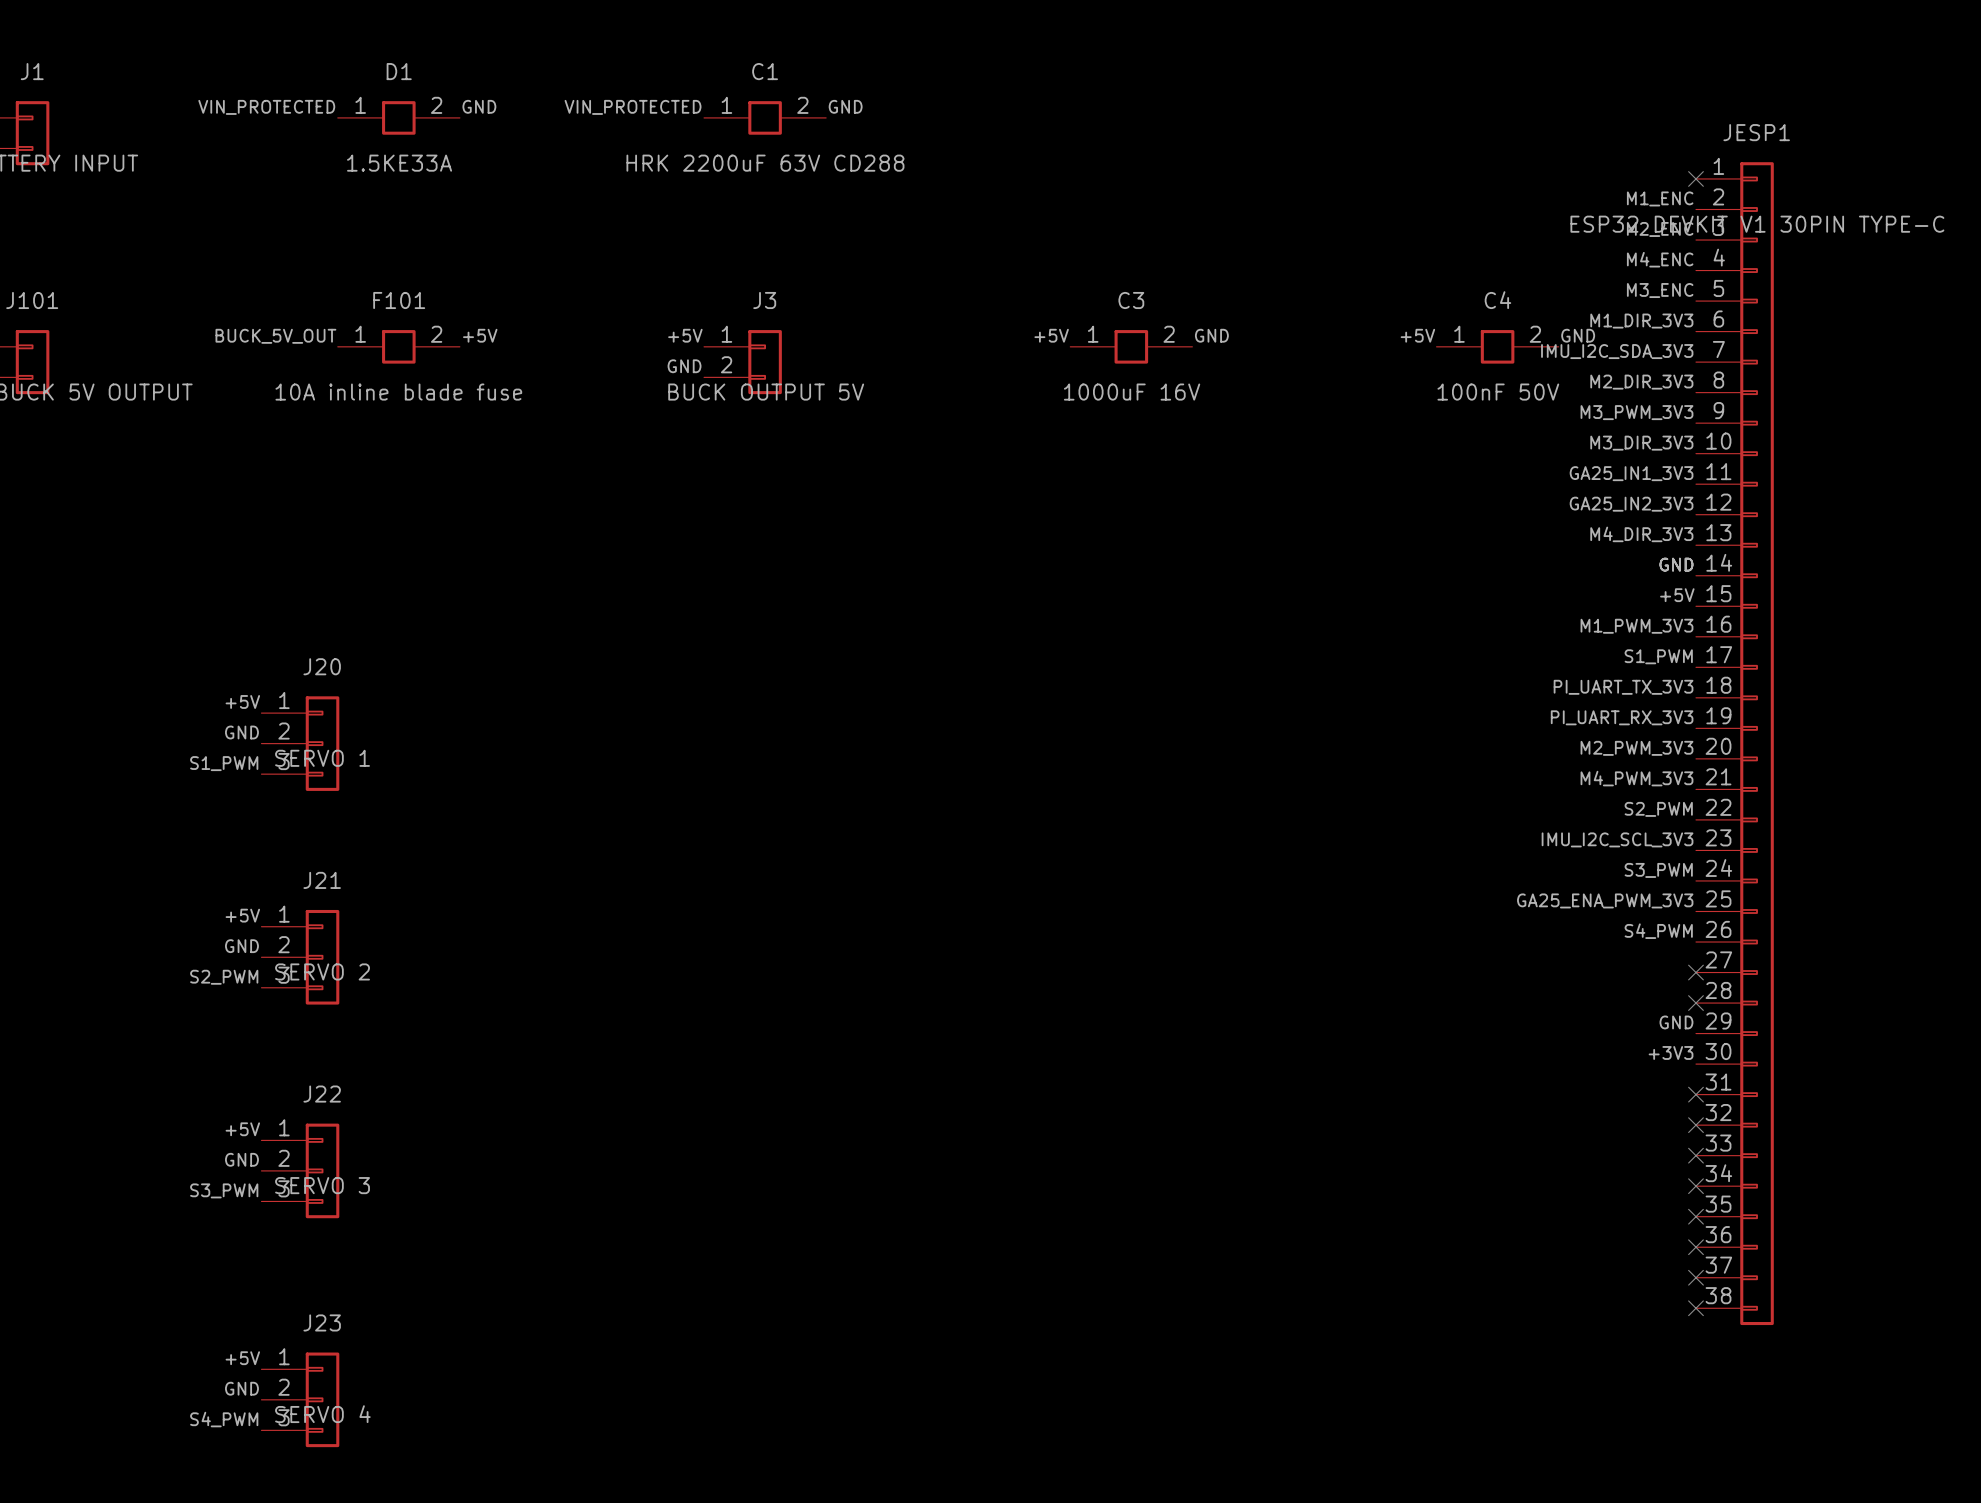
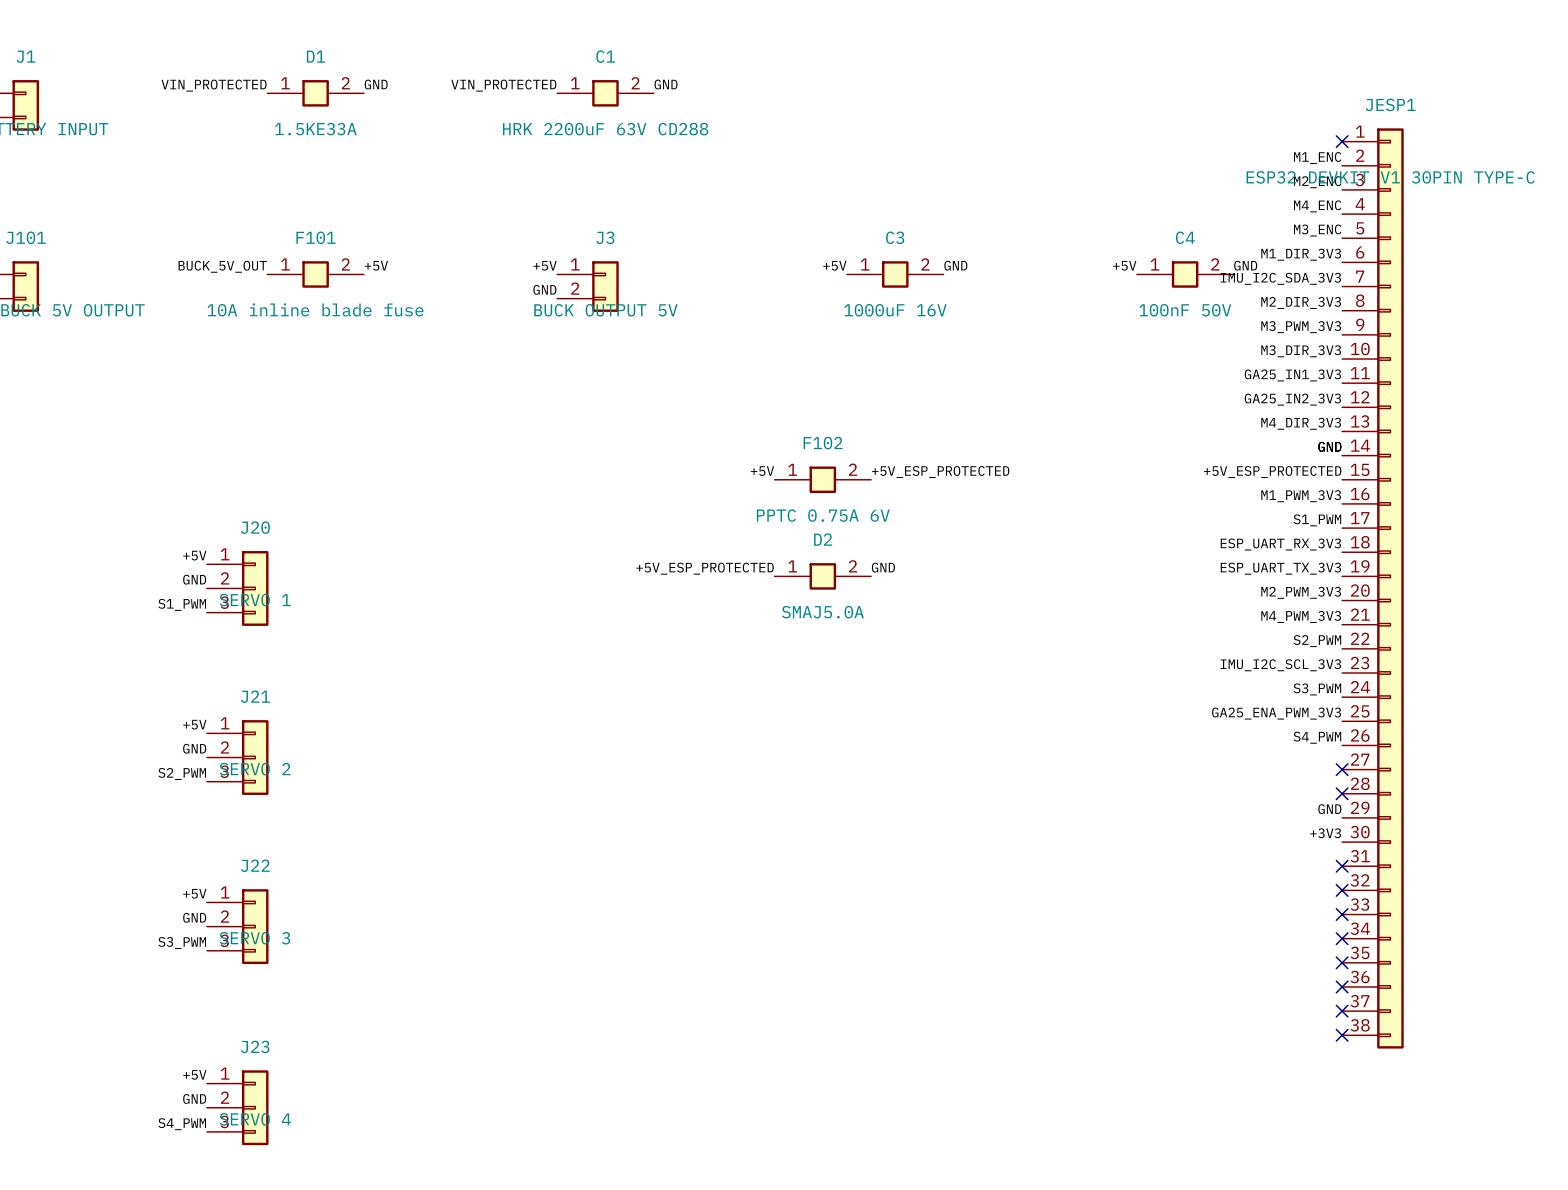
label: none -> +5V (762, 471)
label: none -> +5V_ESP_PROTECTED (940, 472)
label: +5V (1677, 595) -> +5V_ESP_PROTECTED (1272, 472)
F102: none -> PPTC 0.75A 6V (822, 479)
label: PI_UART_TX_3V3 (1623, 687) -> ESP_UART_RX_3V3 (1280, 544)
label: none -> +5V_ESP_PROTECTED (705, 568)
label: none -> GND (883, 567)
label: PI_UART_RX_3V3 (1622, 717) -> ESP_UART_TX_3V3 (1280, 568)
D2: none -> SMAJ5.0A (822, 576)

